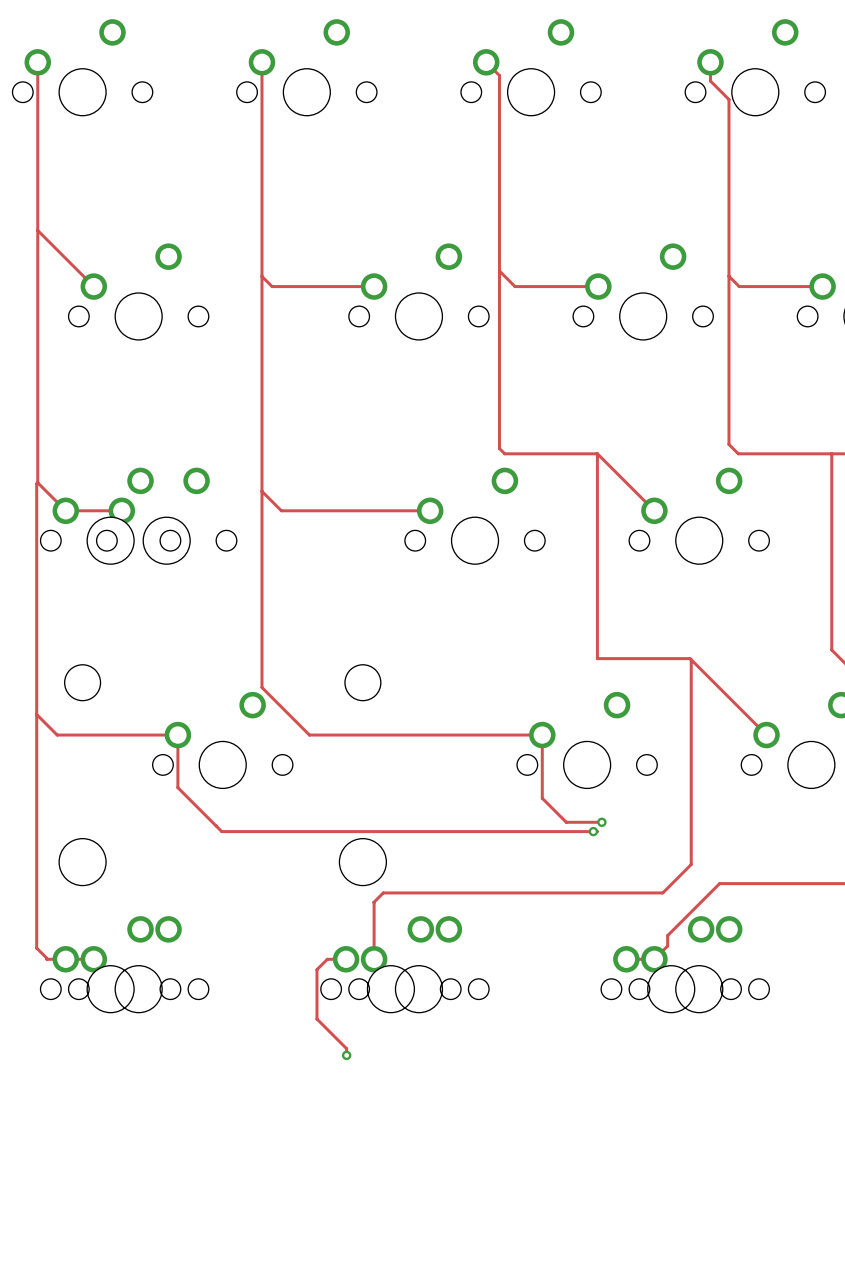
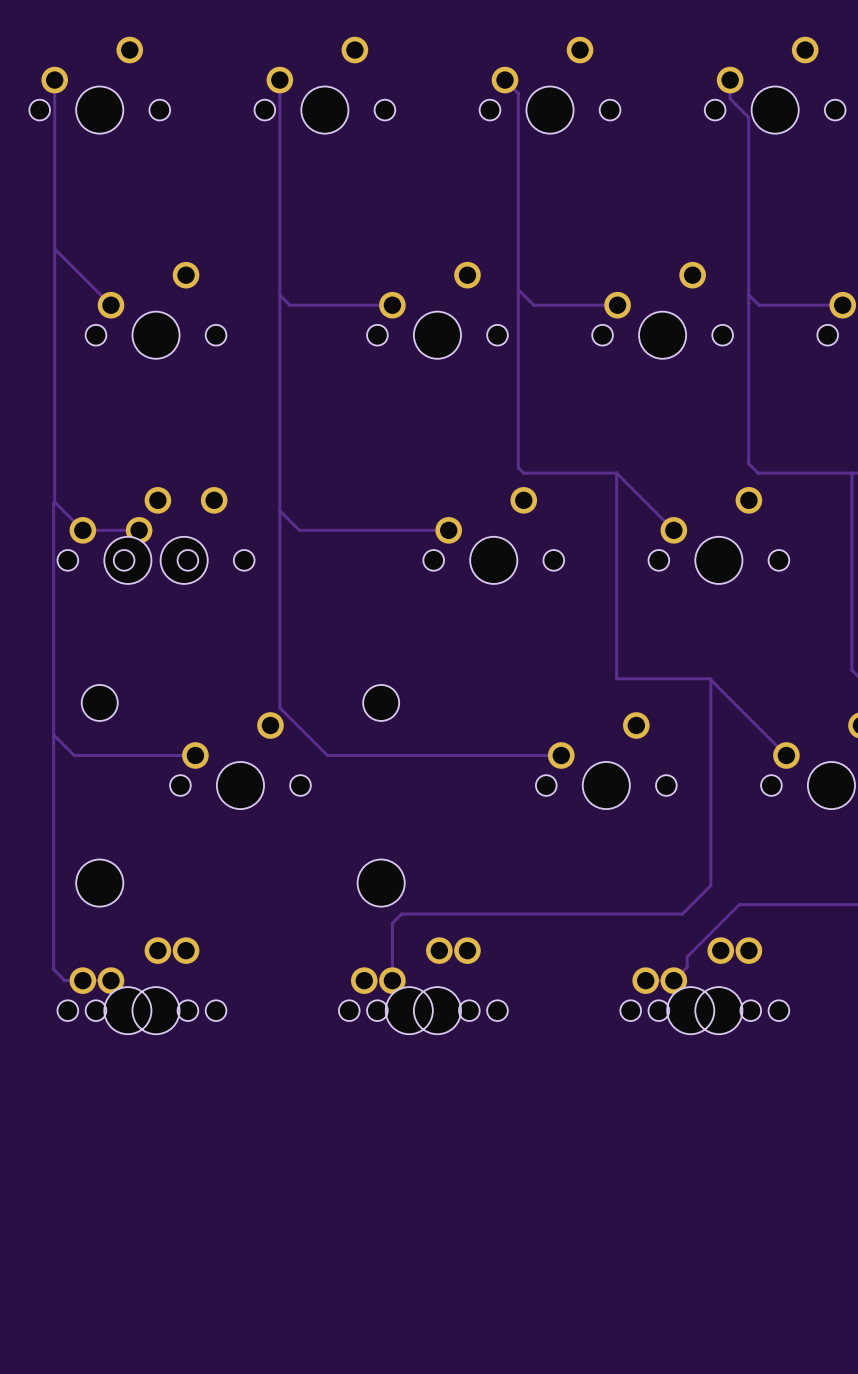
track: (177, 735) (177, 787) (221, 831) (597, 831) -> none
track: (542, 735) (542, 798) (566, 822) (602, 822) -> none
via: (601, 822) -> none
via: (593, 831) -> none
track: (346, 959) (327, 959) (316, 969) (316, 1019) (346, 1048) (346, 1055) -> none
via: (346, 1055) -> none

